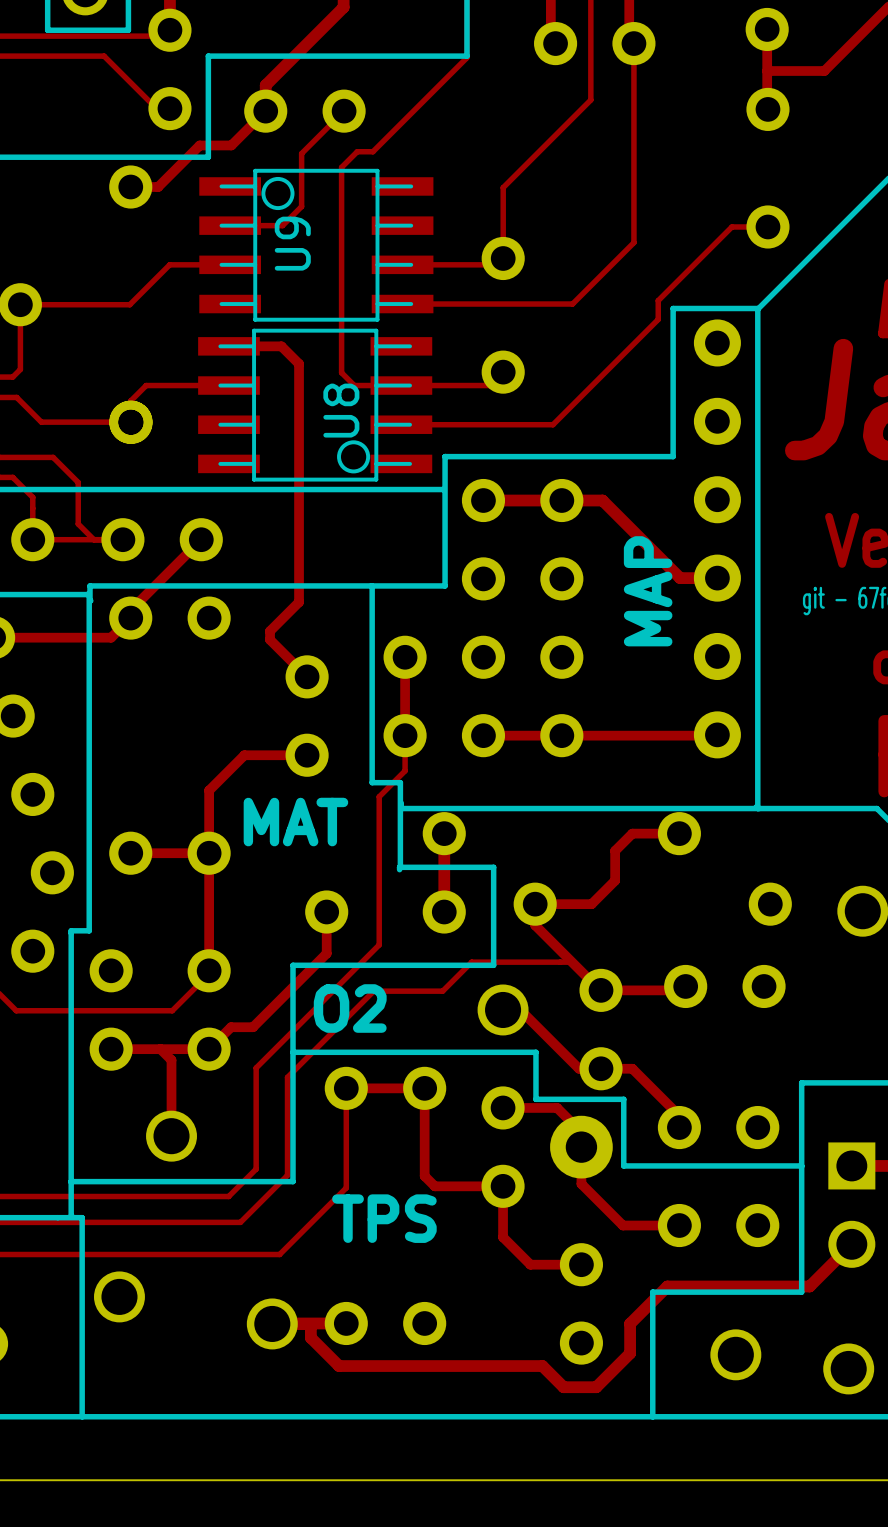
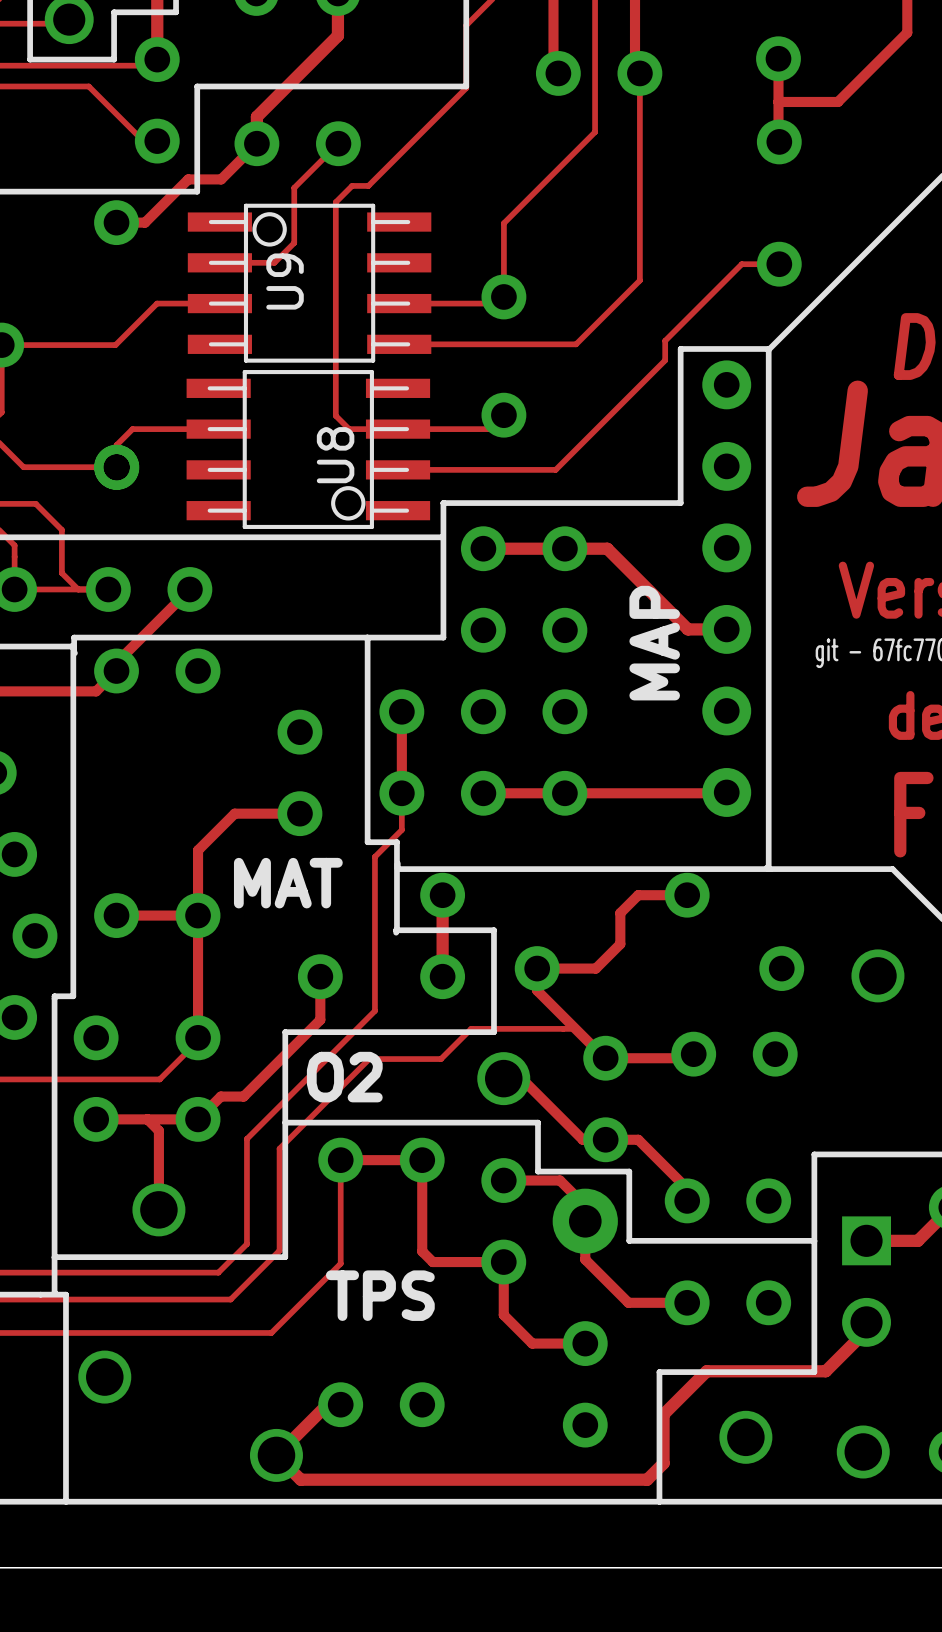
track: (228, 346) (281, 346) (299, 363) (299, 602) (270, 631) (270, 639) (307, 676) -> none
track: (851, 1244) (809, 1286) (667, 1286) (630, 1323) (630, 1353) (596, 1387) (563, 1387) (542, 1366) (339, 1366) (310, 1337) (310, 1326) (308, 1323) (272, 1323) (333, 1323) -> (866, 1322) (866, 1330) (825, 1371) (706, 1371) (663, 1414) (663, 1463) (647, 1479) (300, 1479) (276, 1455)
part position: (272, 1323) -> (276, 1455)
track: none -> (327, 1404) (276, 1455)

